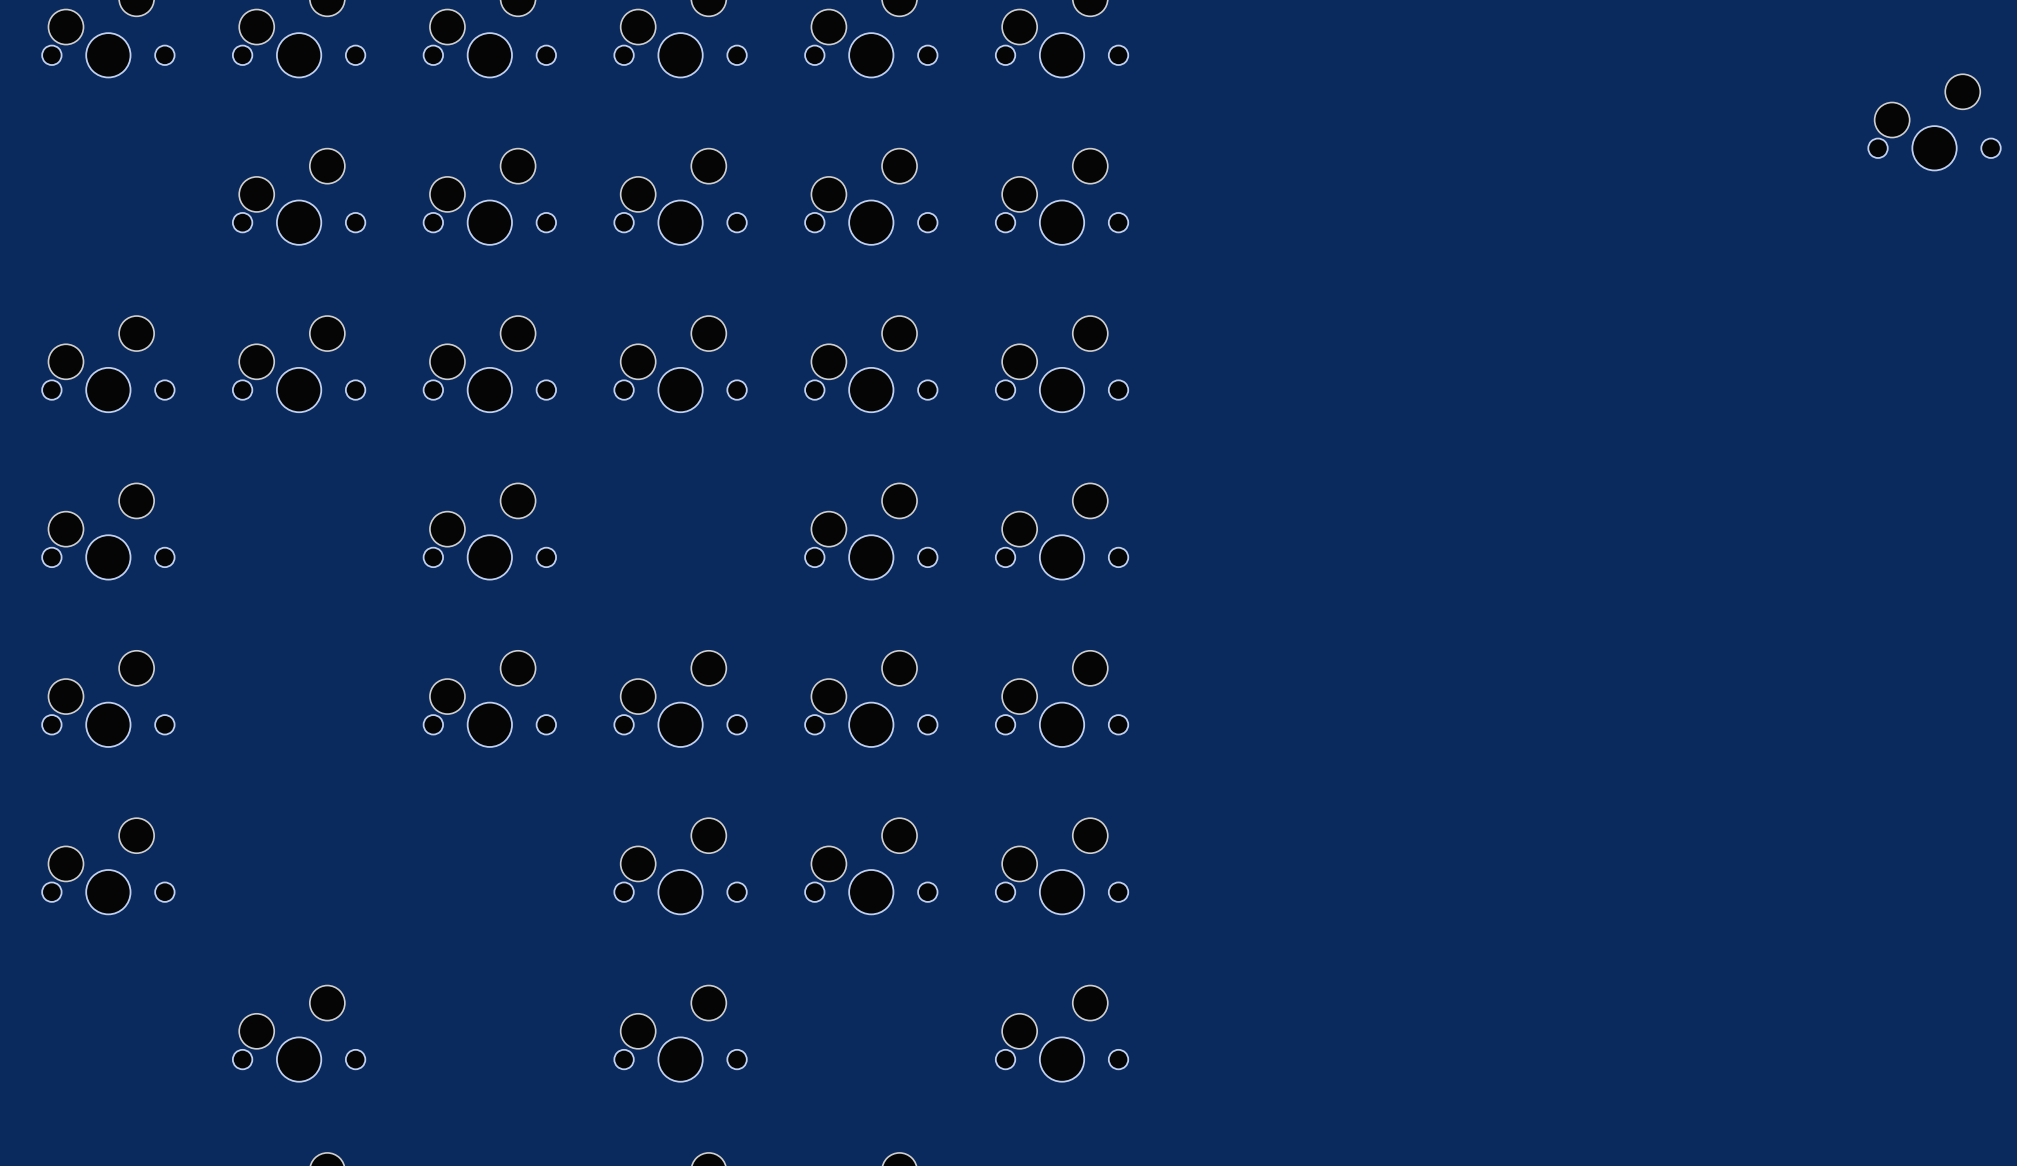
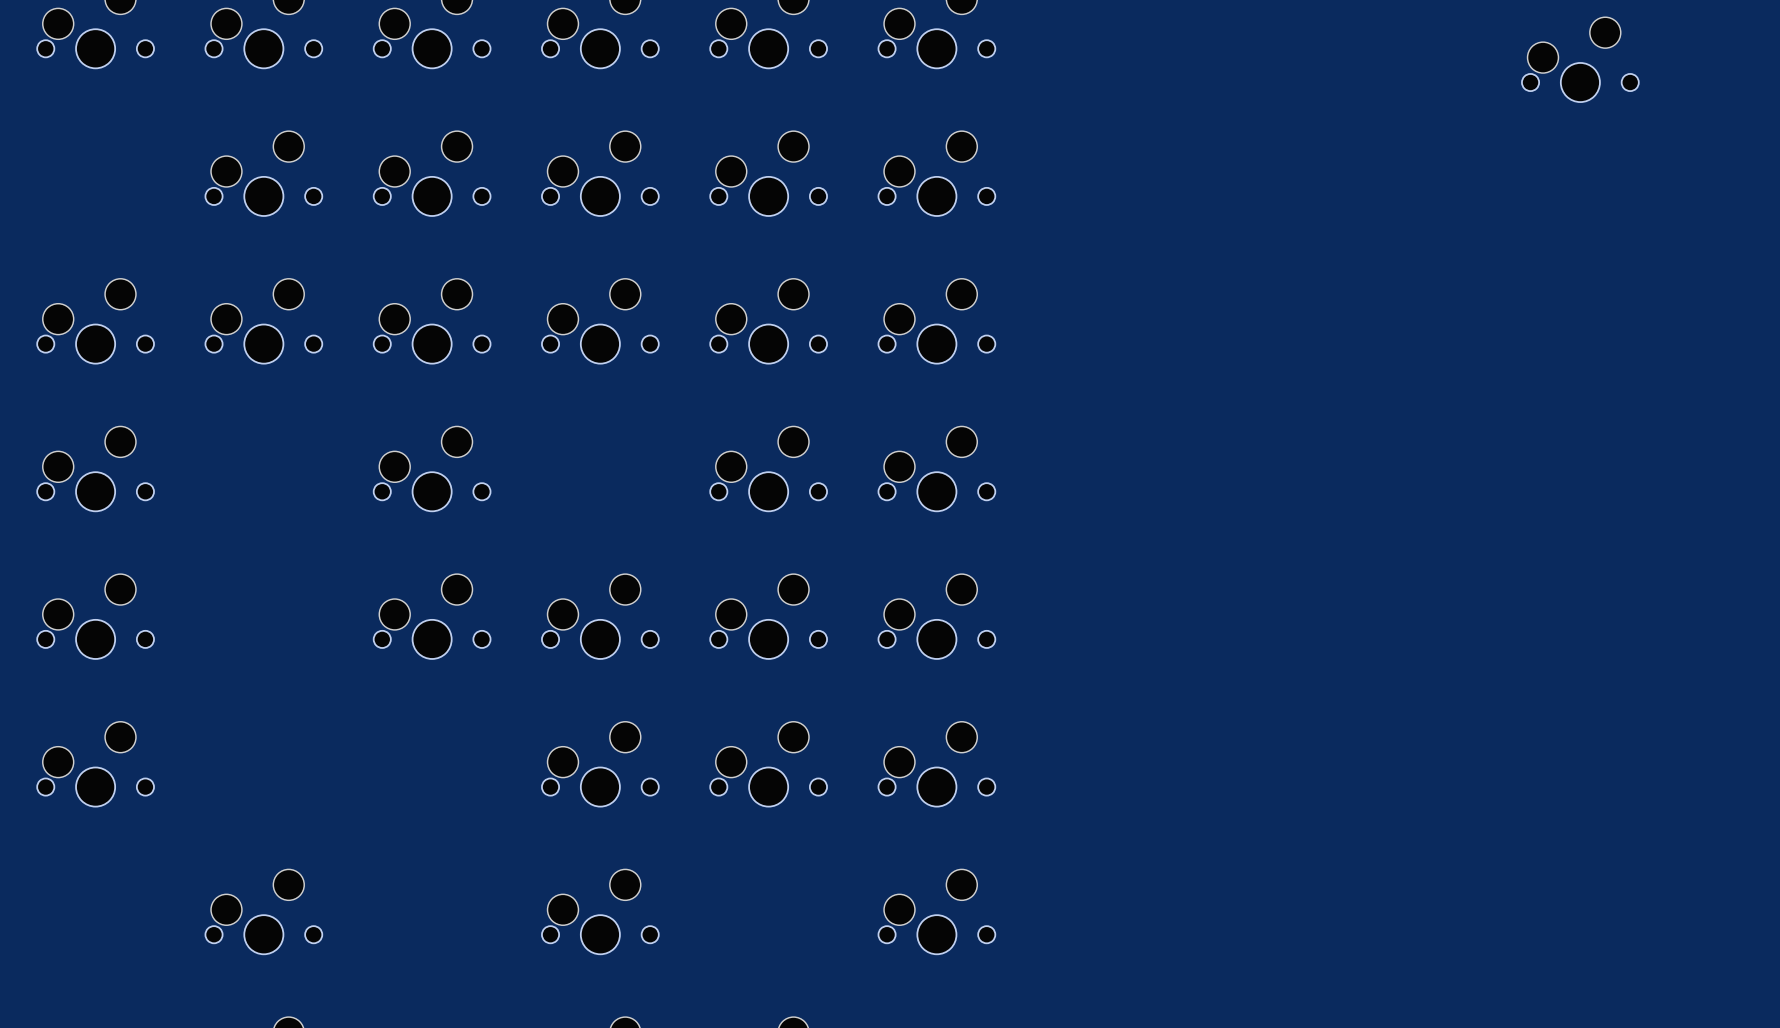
part position: (1934, 121) -> (1580, 59)

